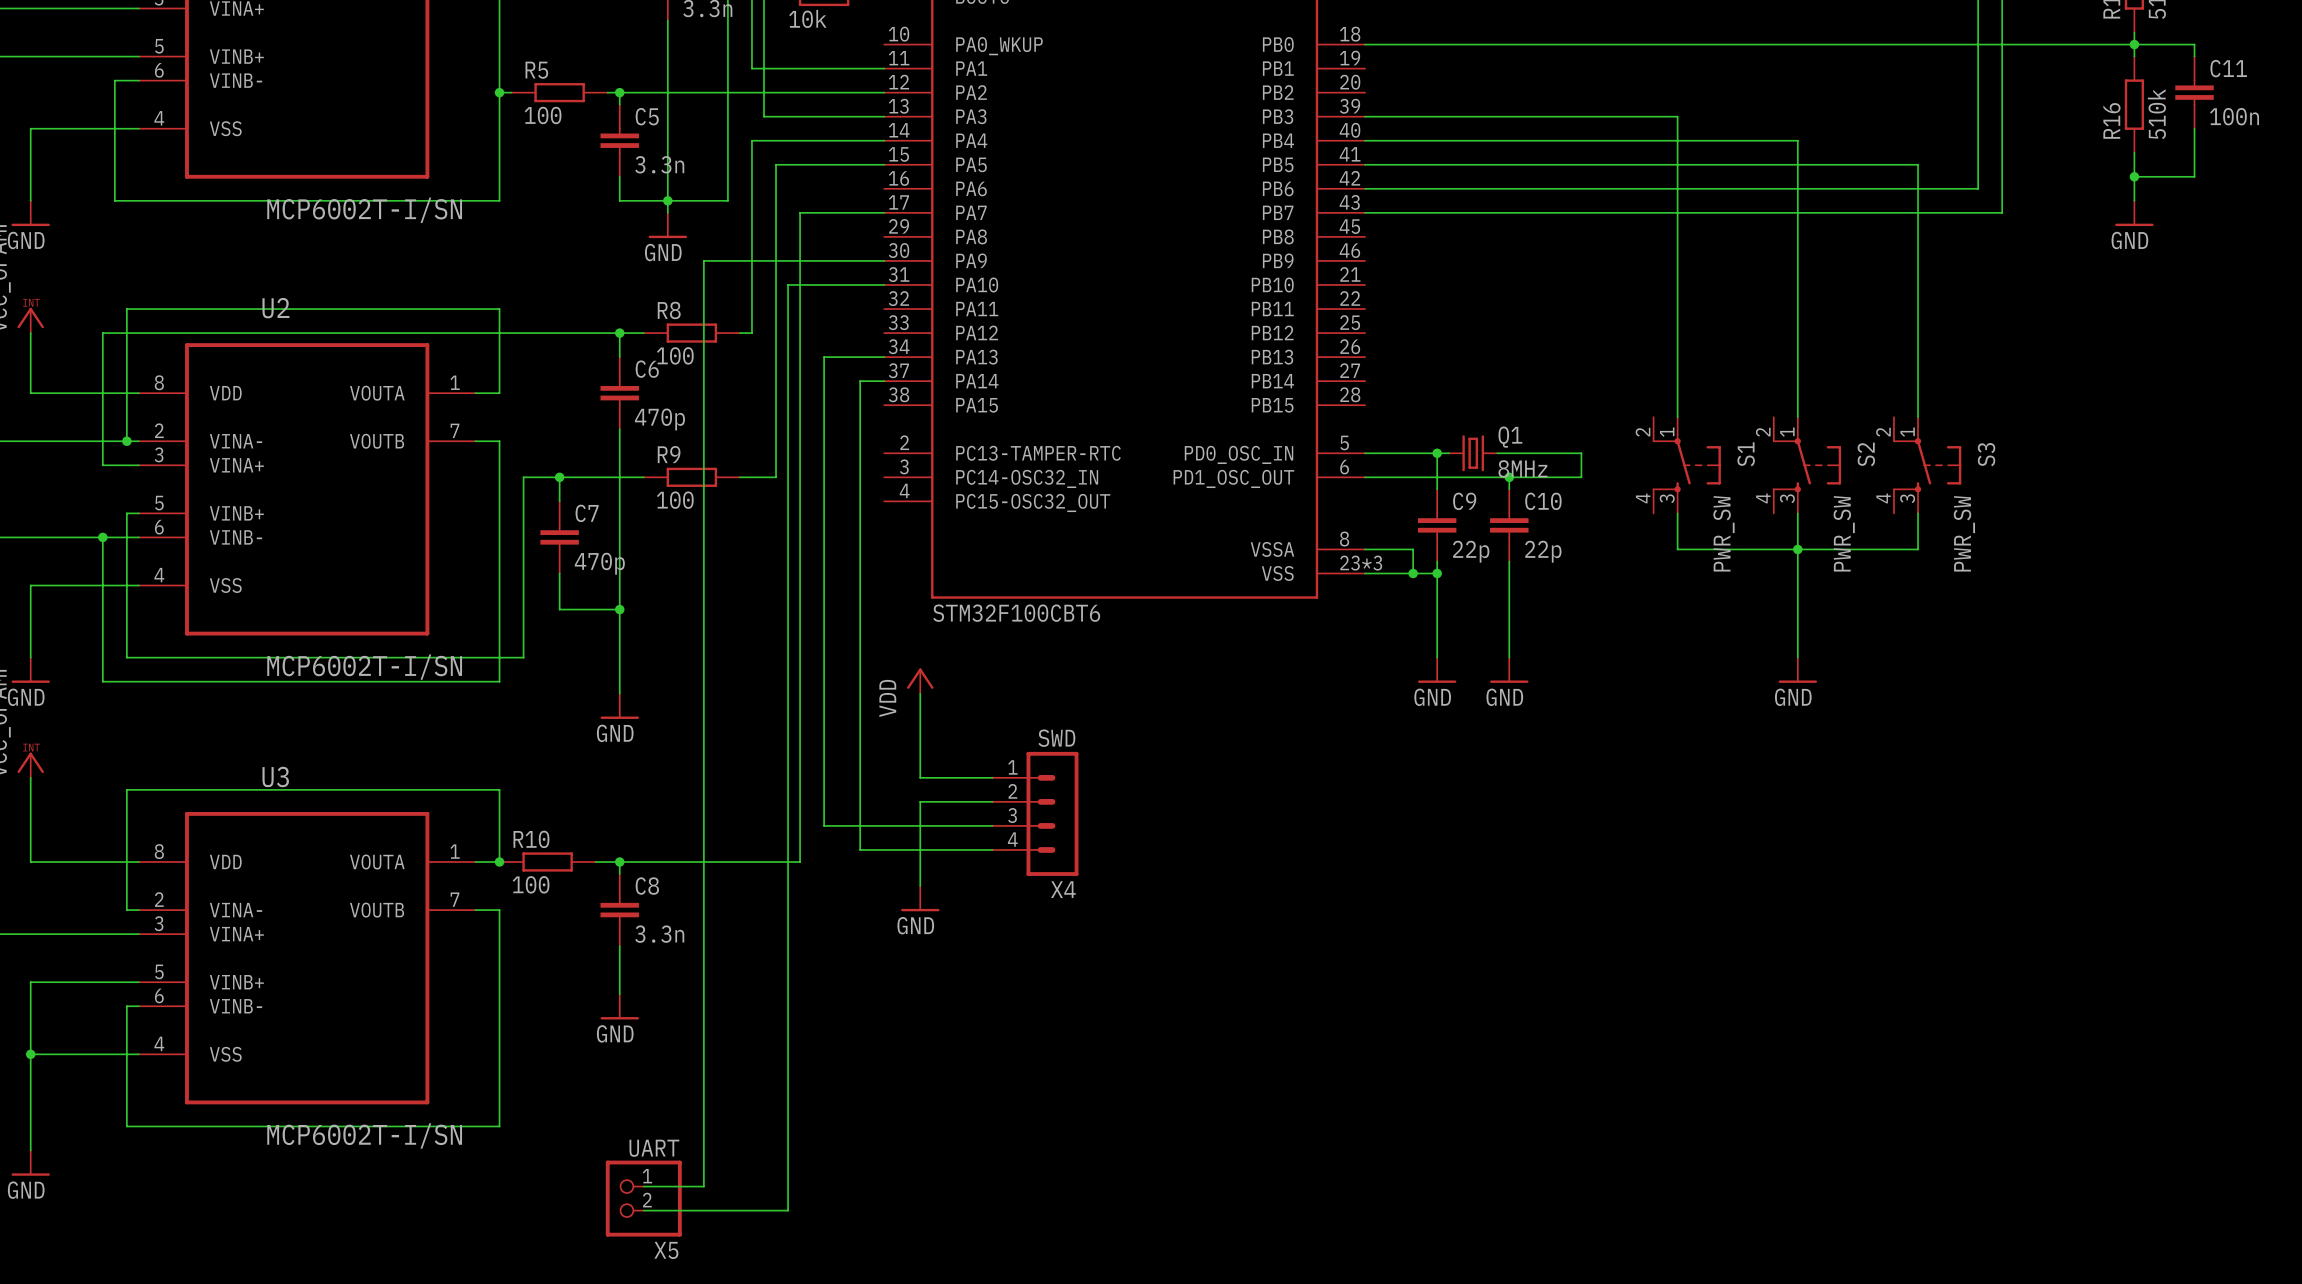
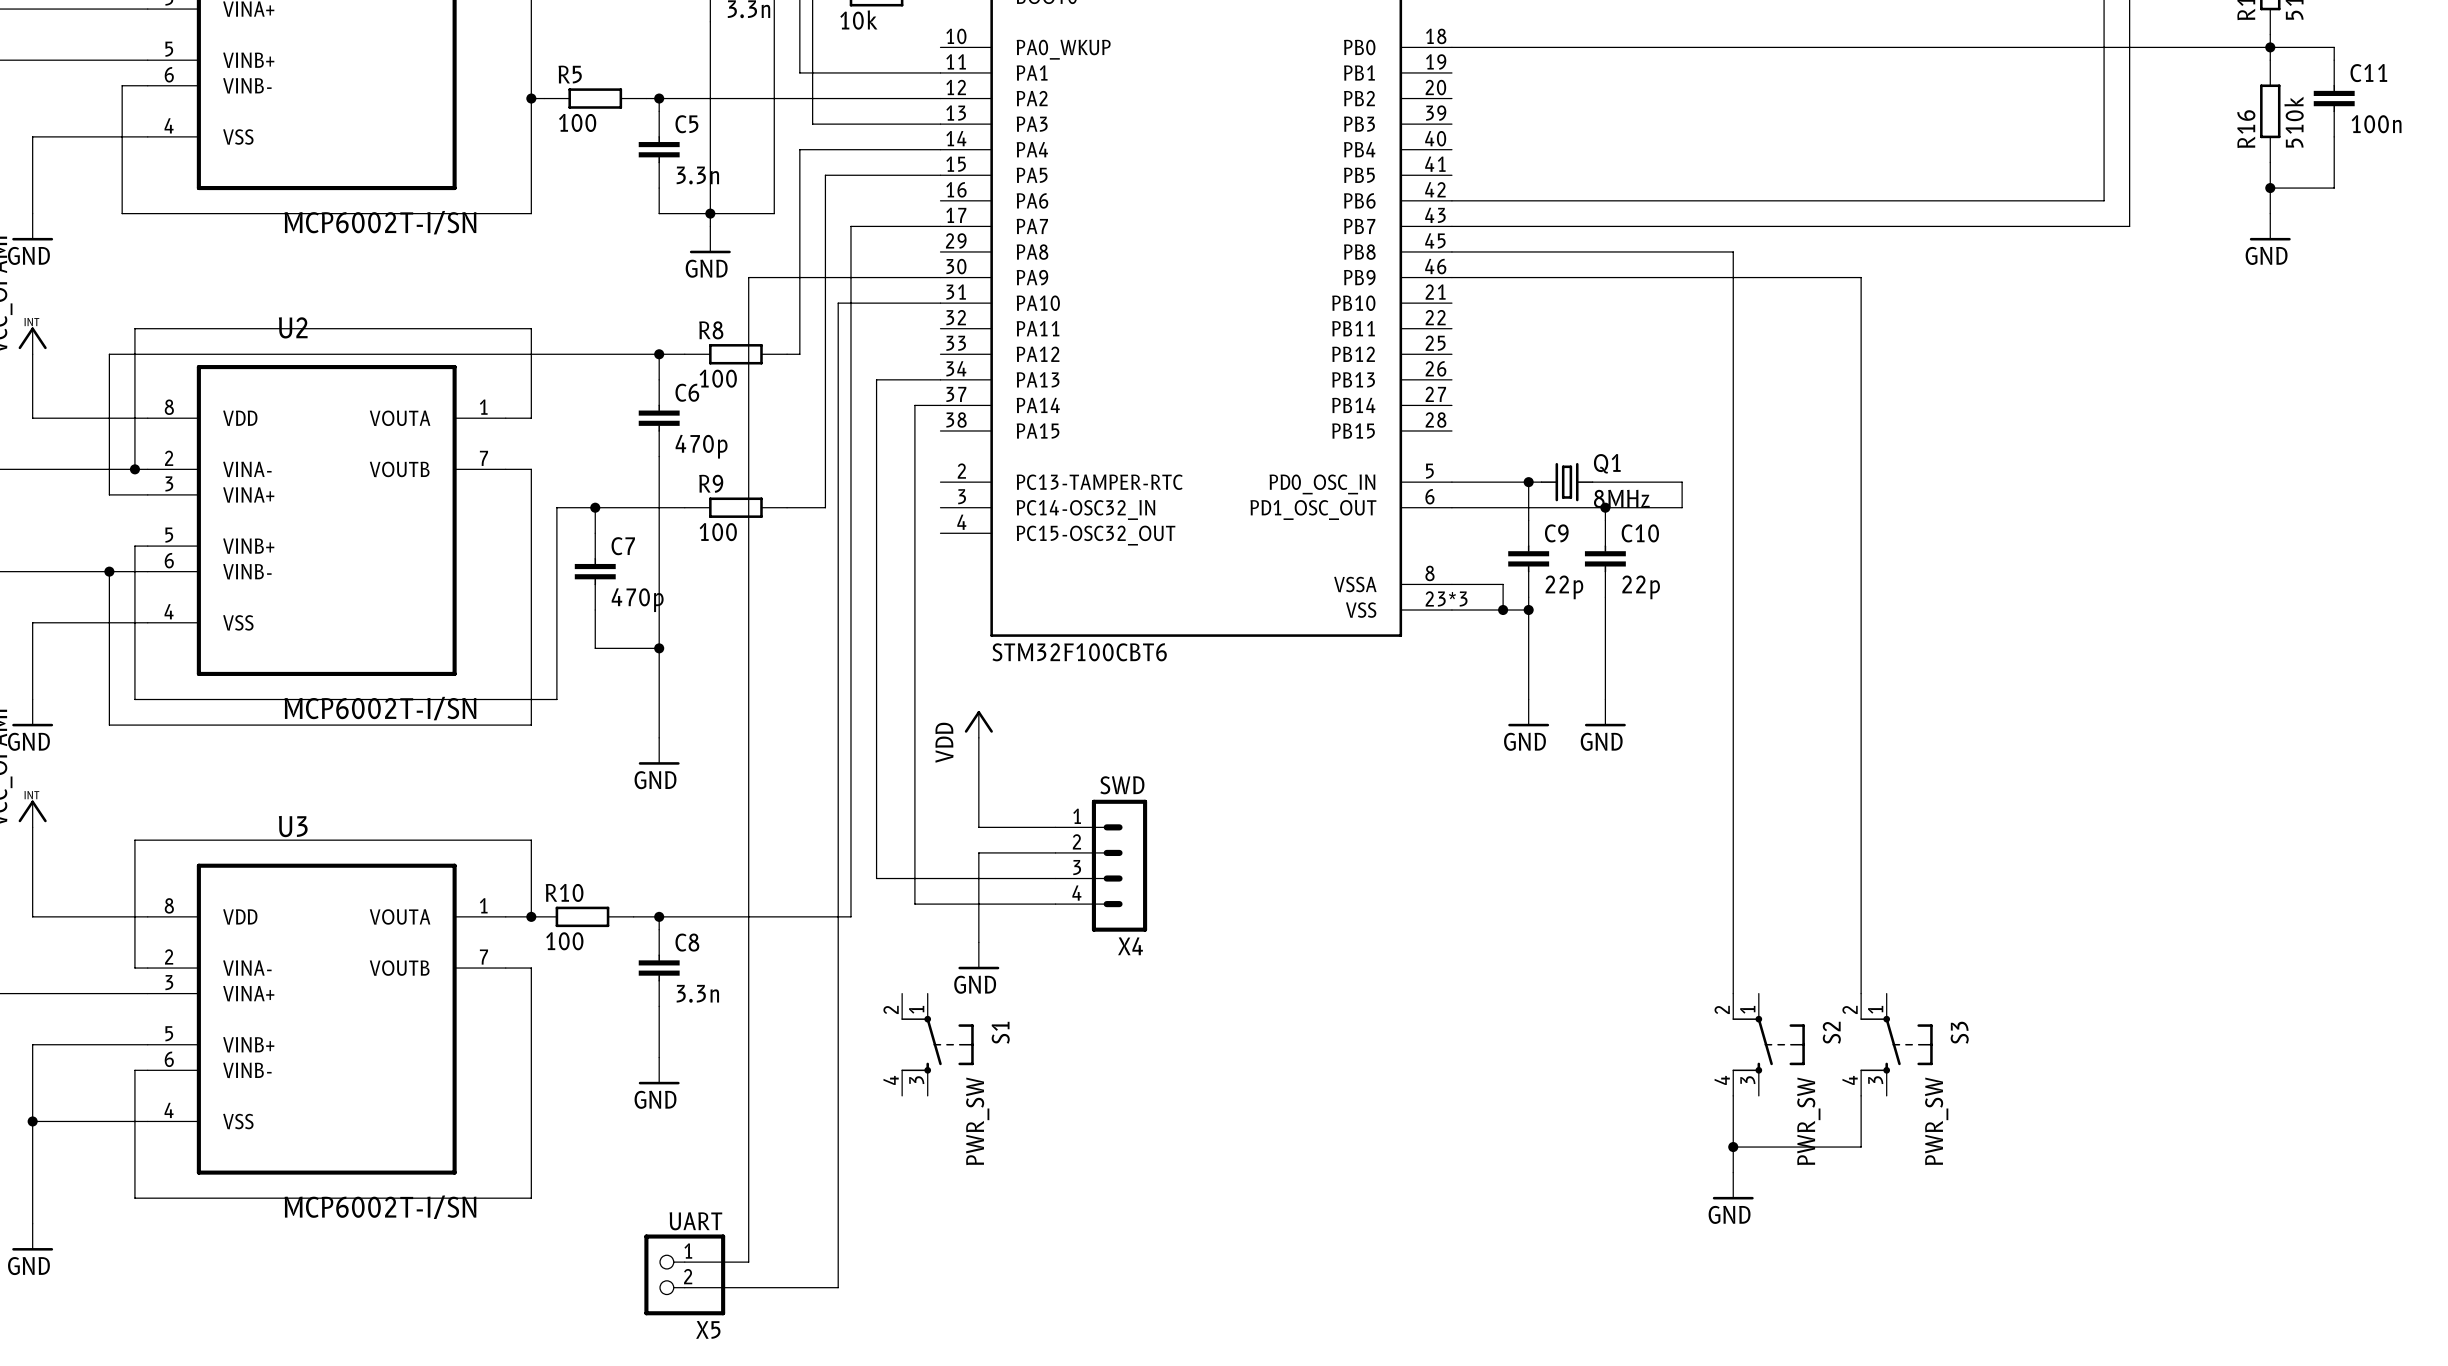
wire: (1365, 116) (1677, 116) (1677, 417) -> none
wire: (1365, 140) (1797, 140) (1797, 417) -> none
wire: (1365, 164) (1918, 164) (1918, 417) -> none
wire: none -> (1451, 251) (1733, 251) (1733, 993)
wire: none -> (1451, 277) (1861, 277) (1861, 993)
S1 position: (1686, 465) -> (937, 1044)
S2 position: (1807, 465) -> (1768, 1044)
S3 position: (1927, 465) -> (1896, 1044)
wire: (1677, 513) (1677, 549) (1918, 549) (1918, 513) -> none
wire: (1797, 513) (1797, 657) -> none
junction: (1797, 549) -> none
power symbol: GND (1797, 670) -> none
wire: none -> (1733, 1095) (1733, 1172)
wire: none -> (1861, 1095) (1861, 1147) (1733, 1147)
junction: none -> (1733, 1147)
power symbol: none -> GND (1733, 1186)

